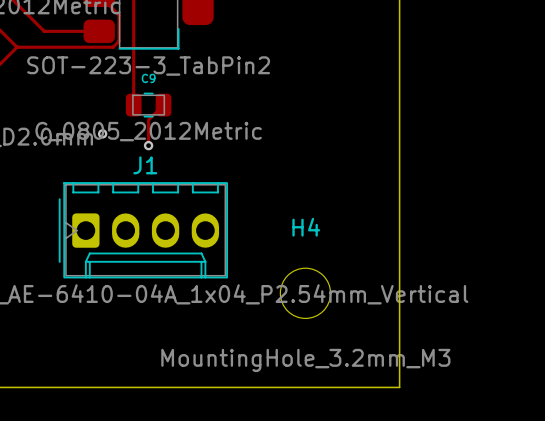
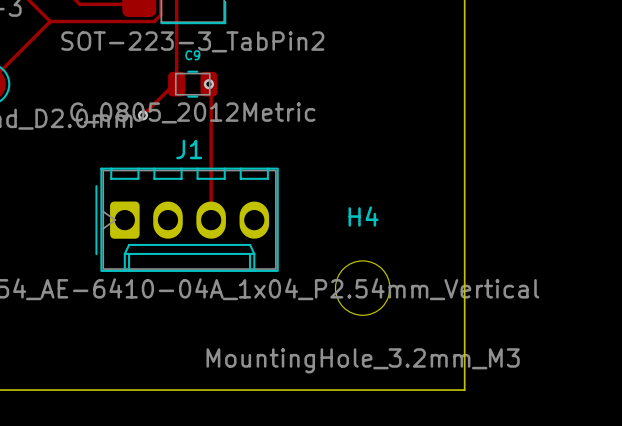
track: none -> (176, 84) (174, 84) (143, 115)
track: (163, 105) (148, 120) (148, 145) -> (208, 84) (211, 86) (211, 220)
via position: (148, 145) -> (208, 84)

